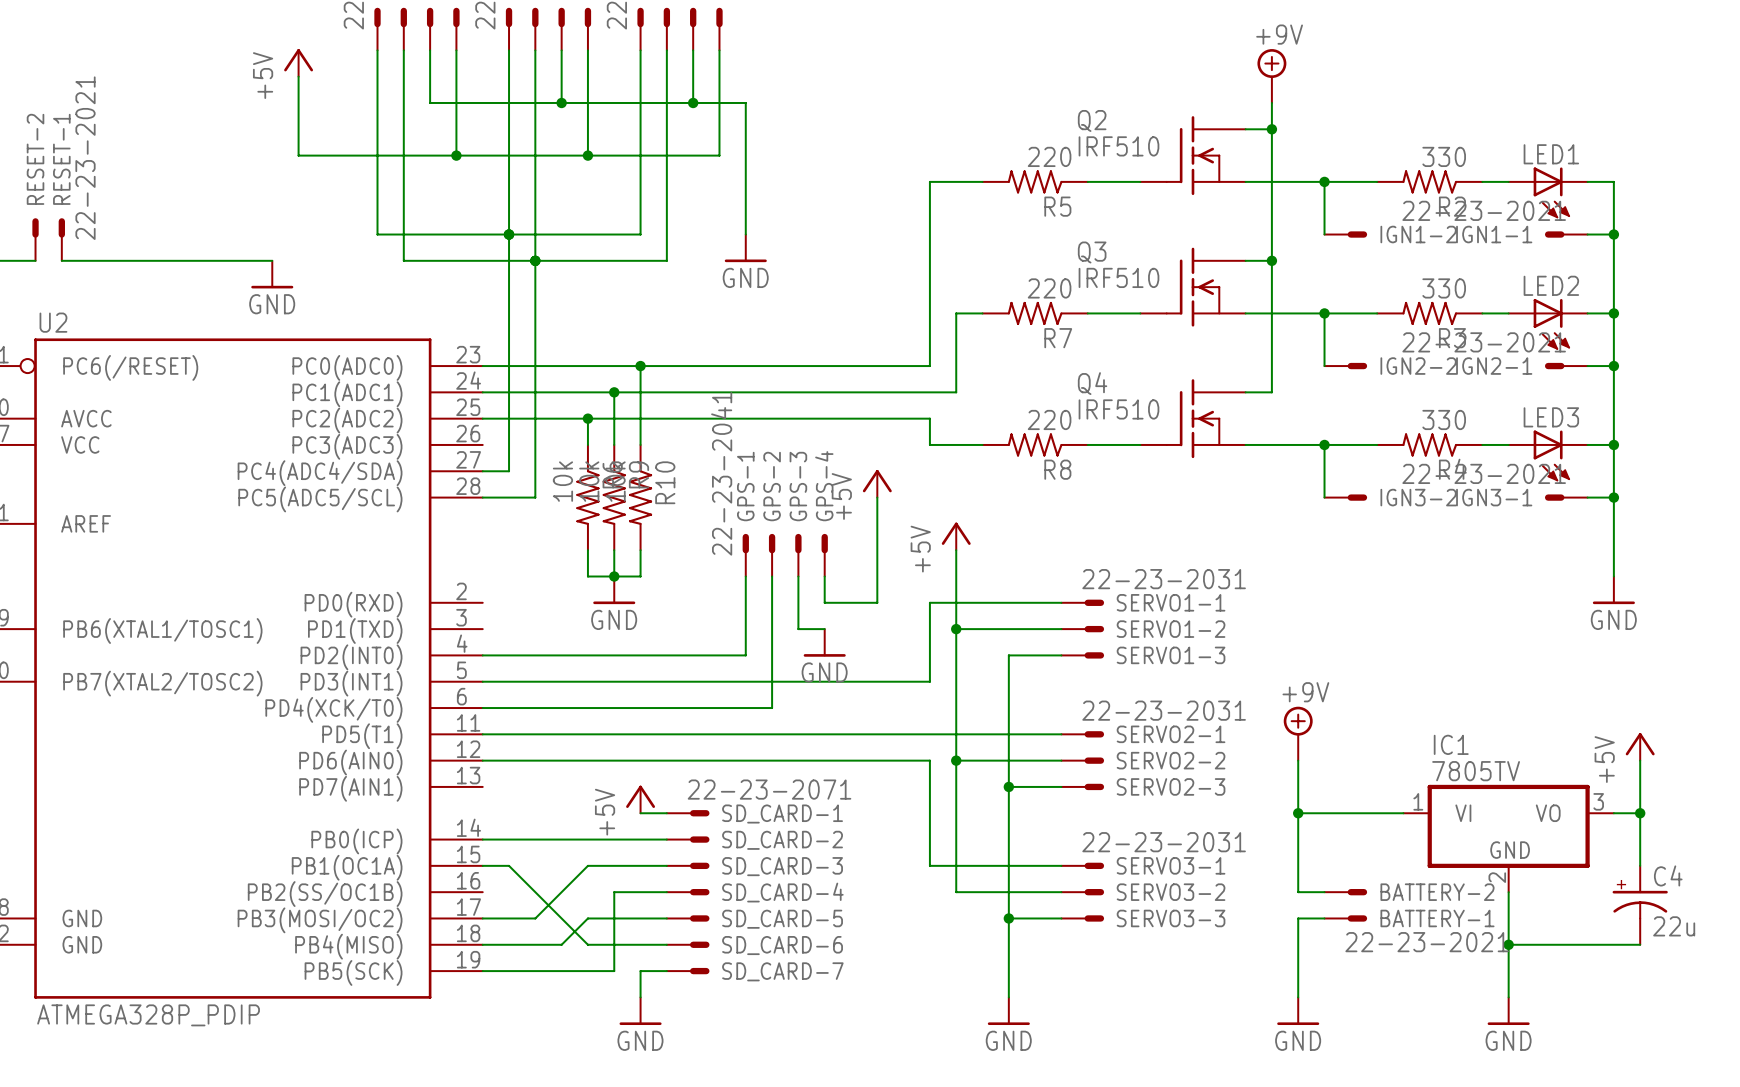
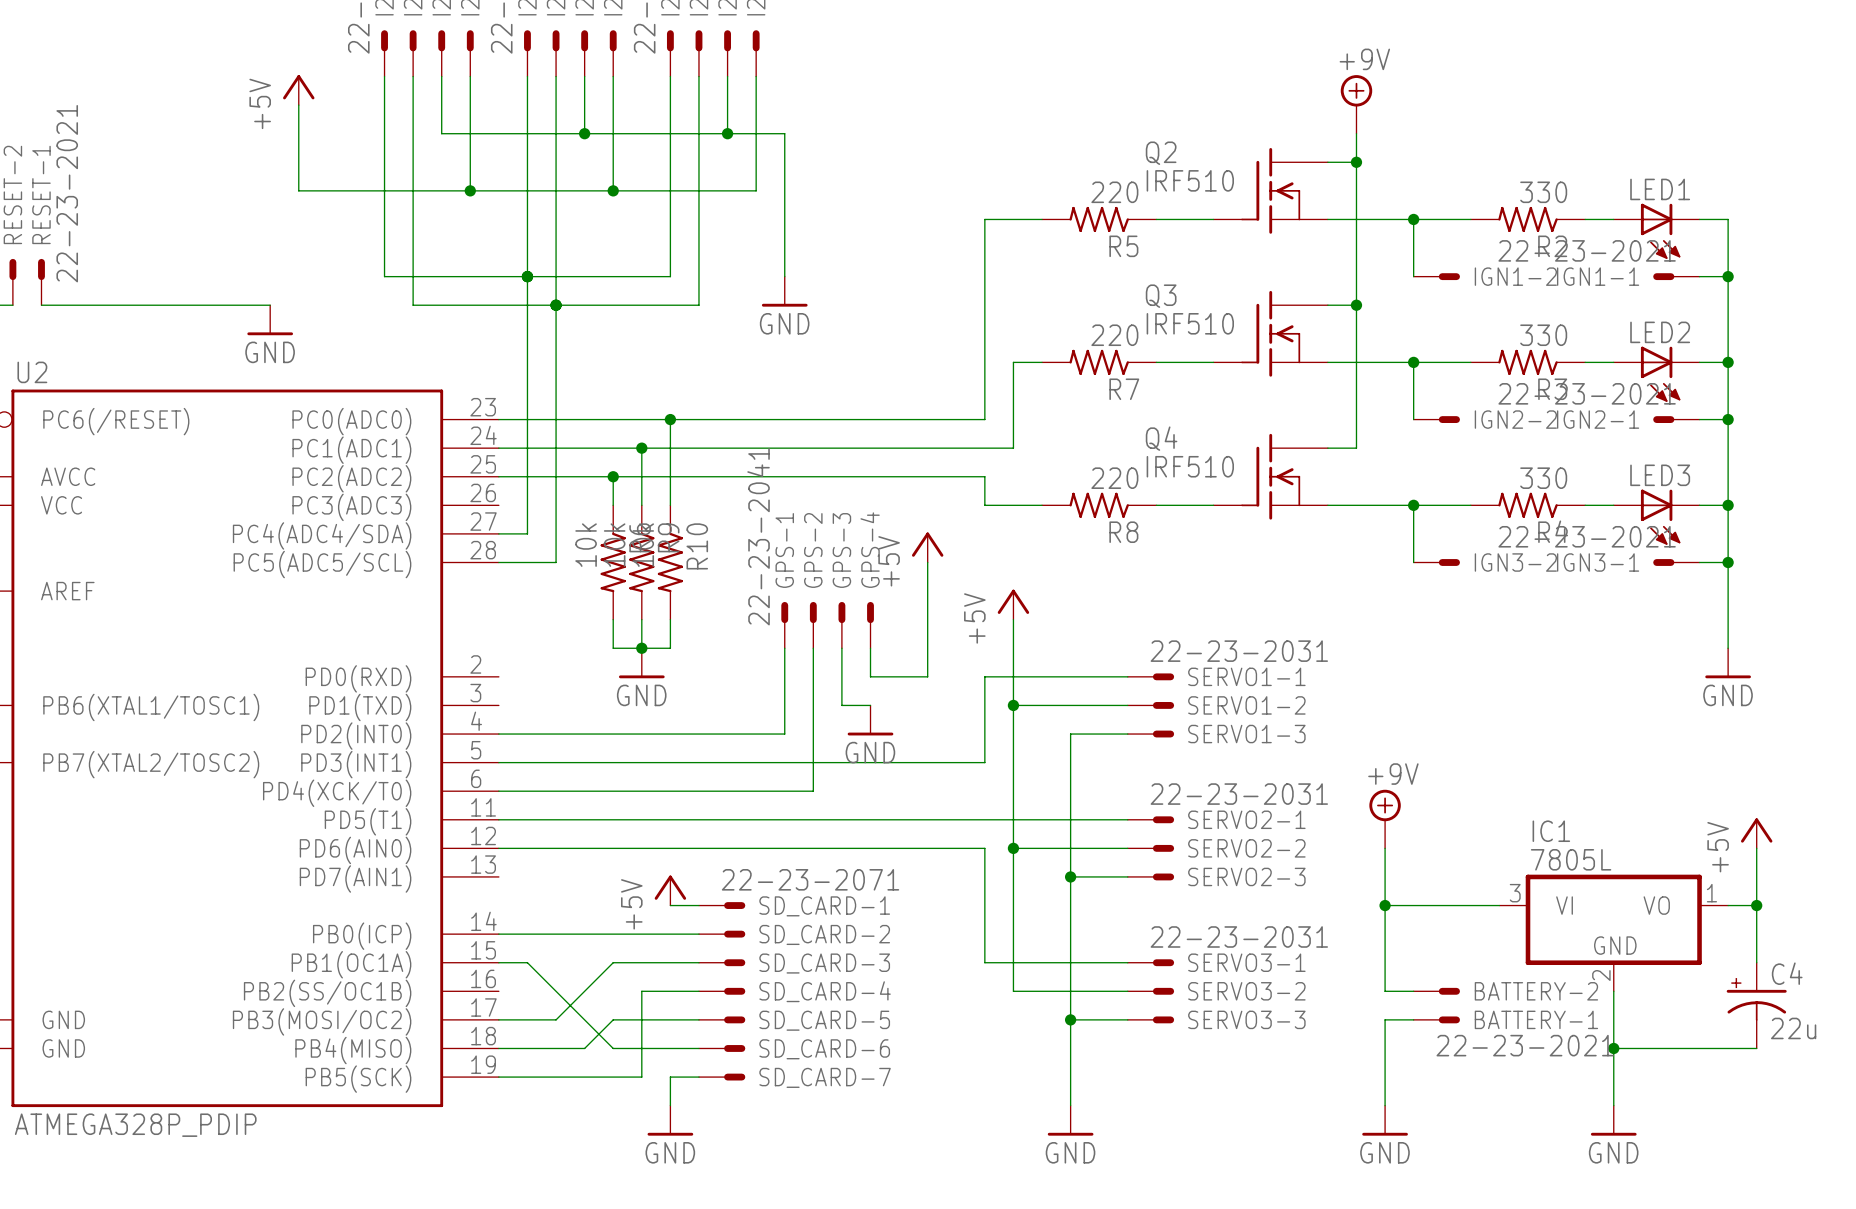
IC1 value: 7805TV (1476, 771) -> 7805L (1571, 859)
IC1 pin number: 1 (1418, 801) -> 3 (1515, 893)
IC1 pin number: 3 (1598, 801) -> 1 (1711, 893)

